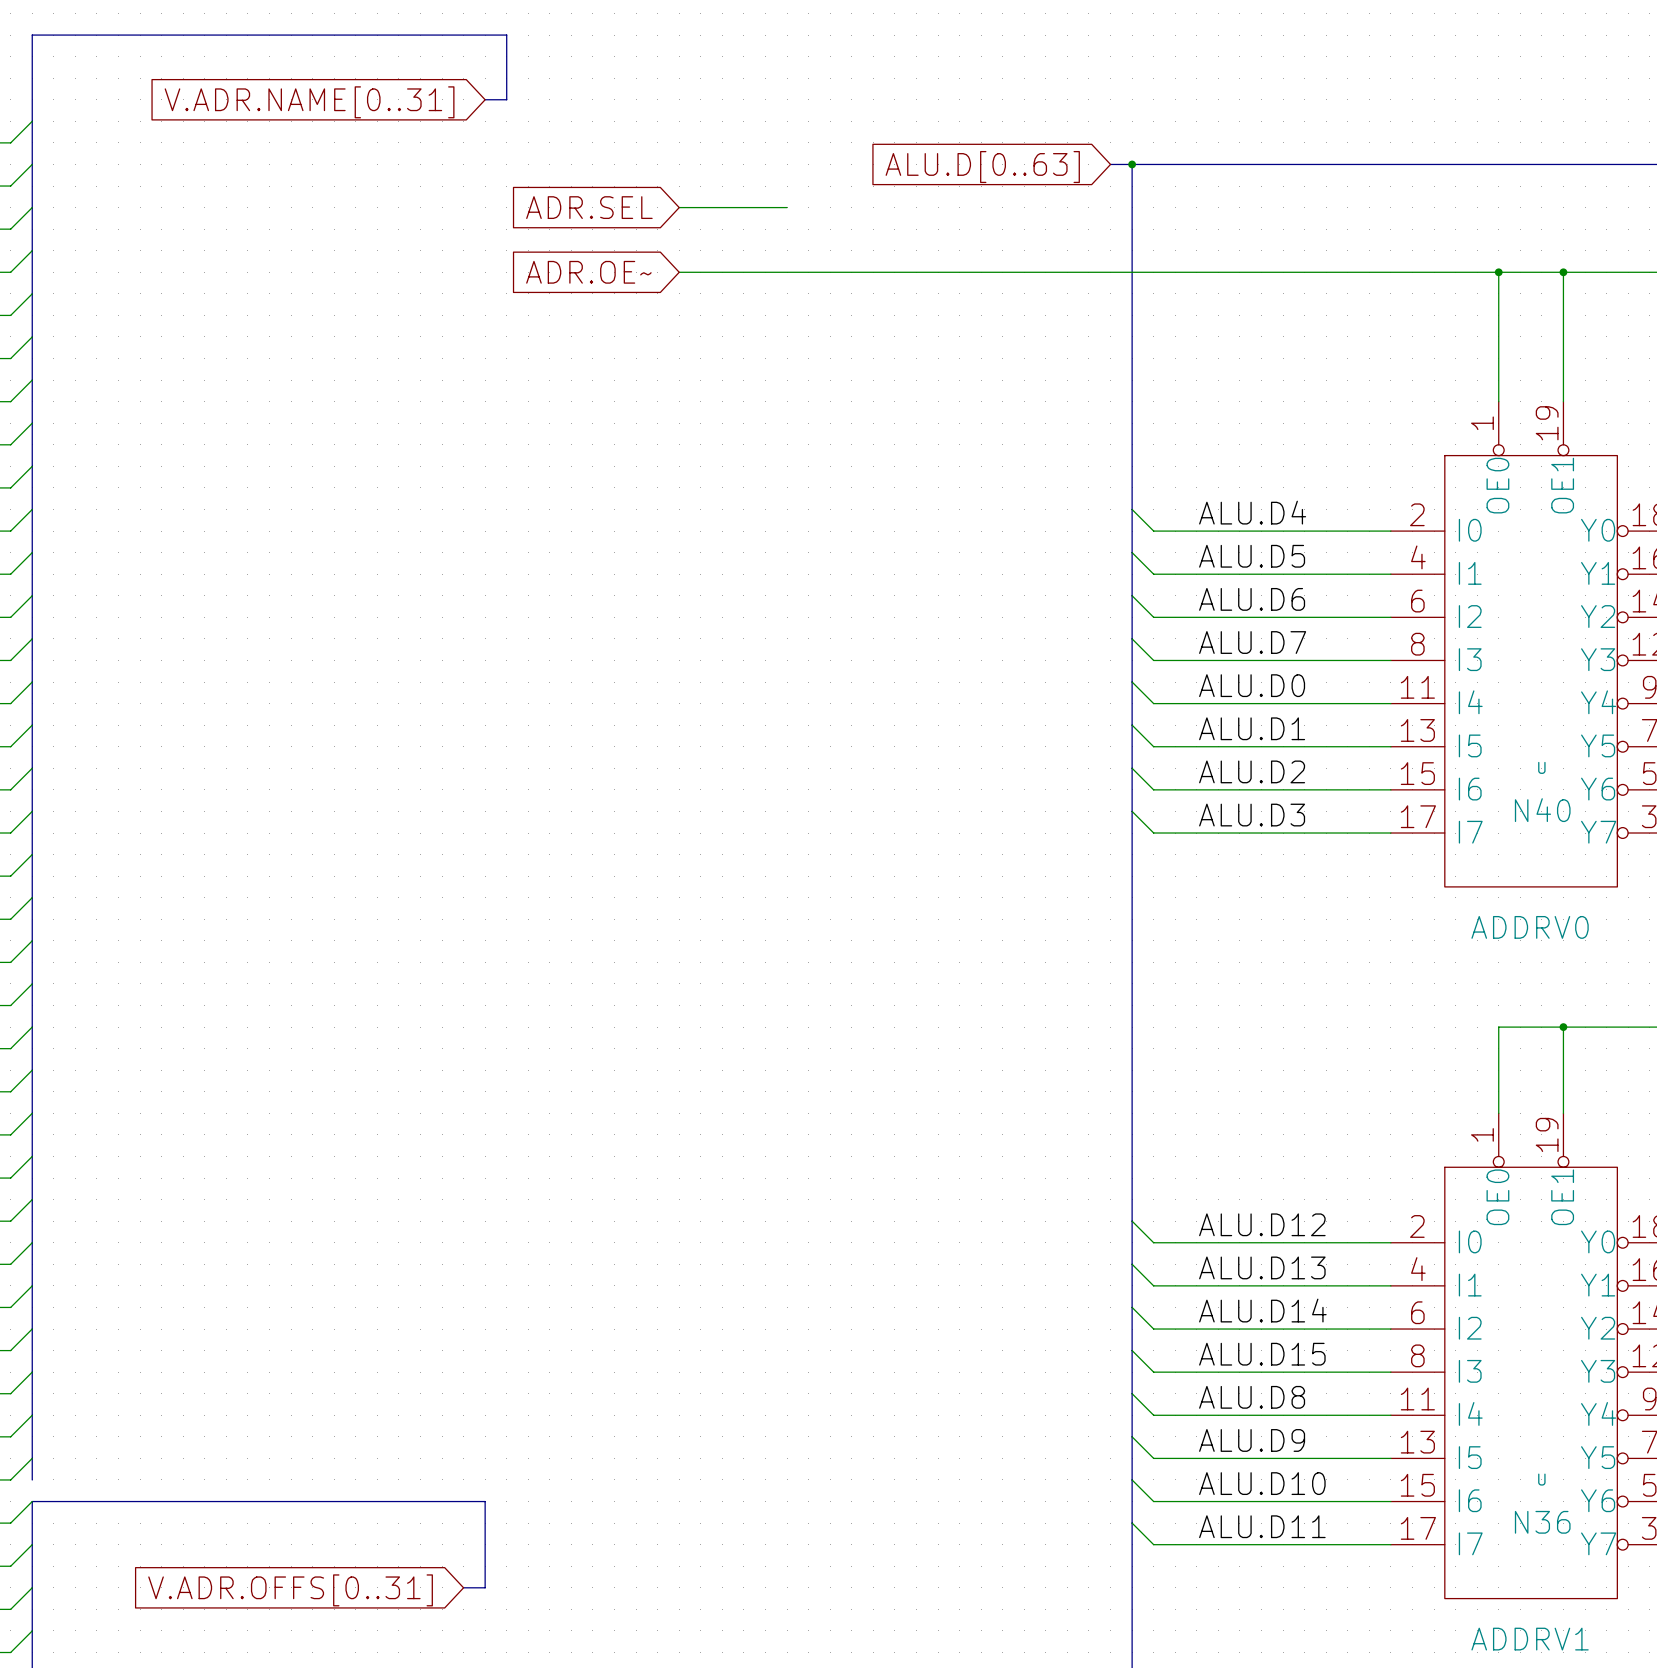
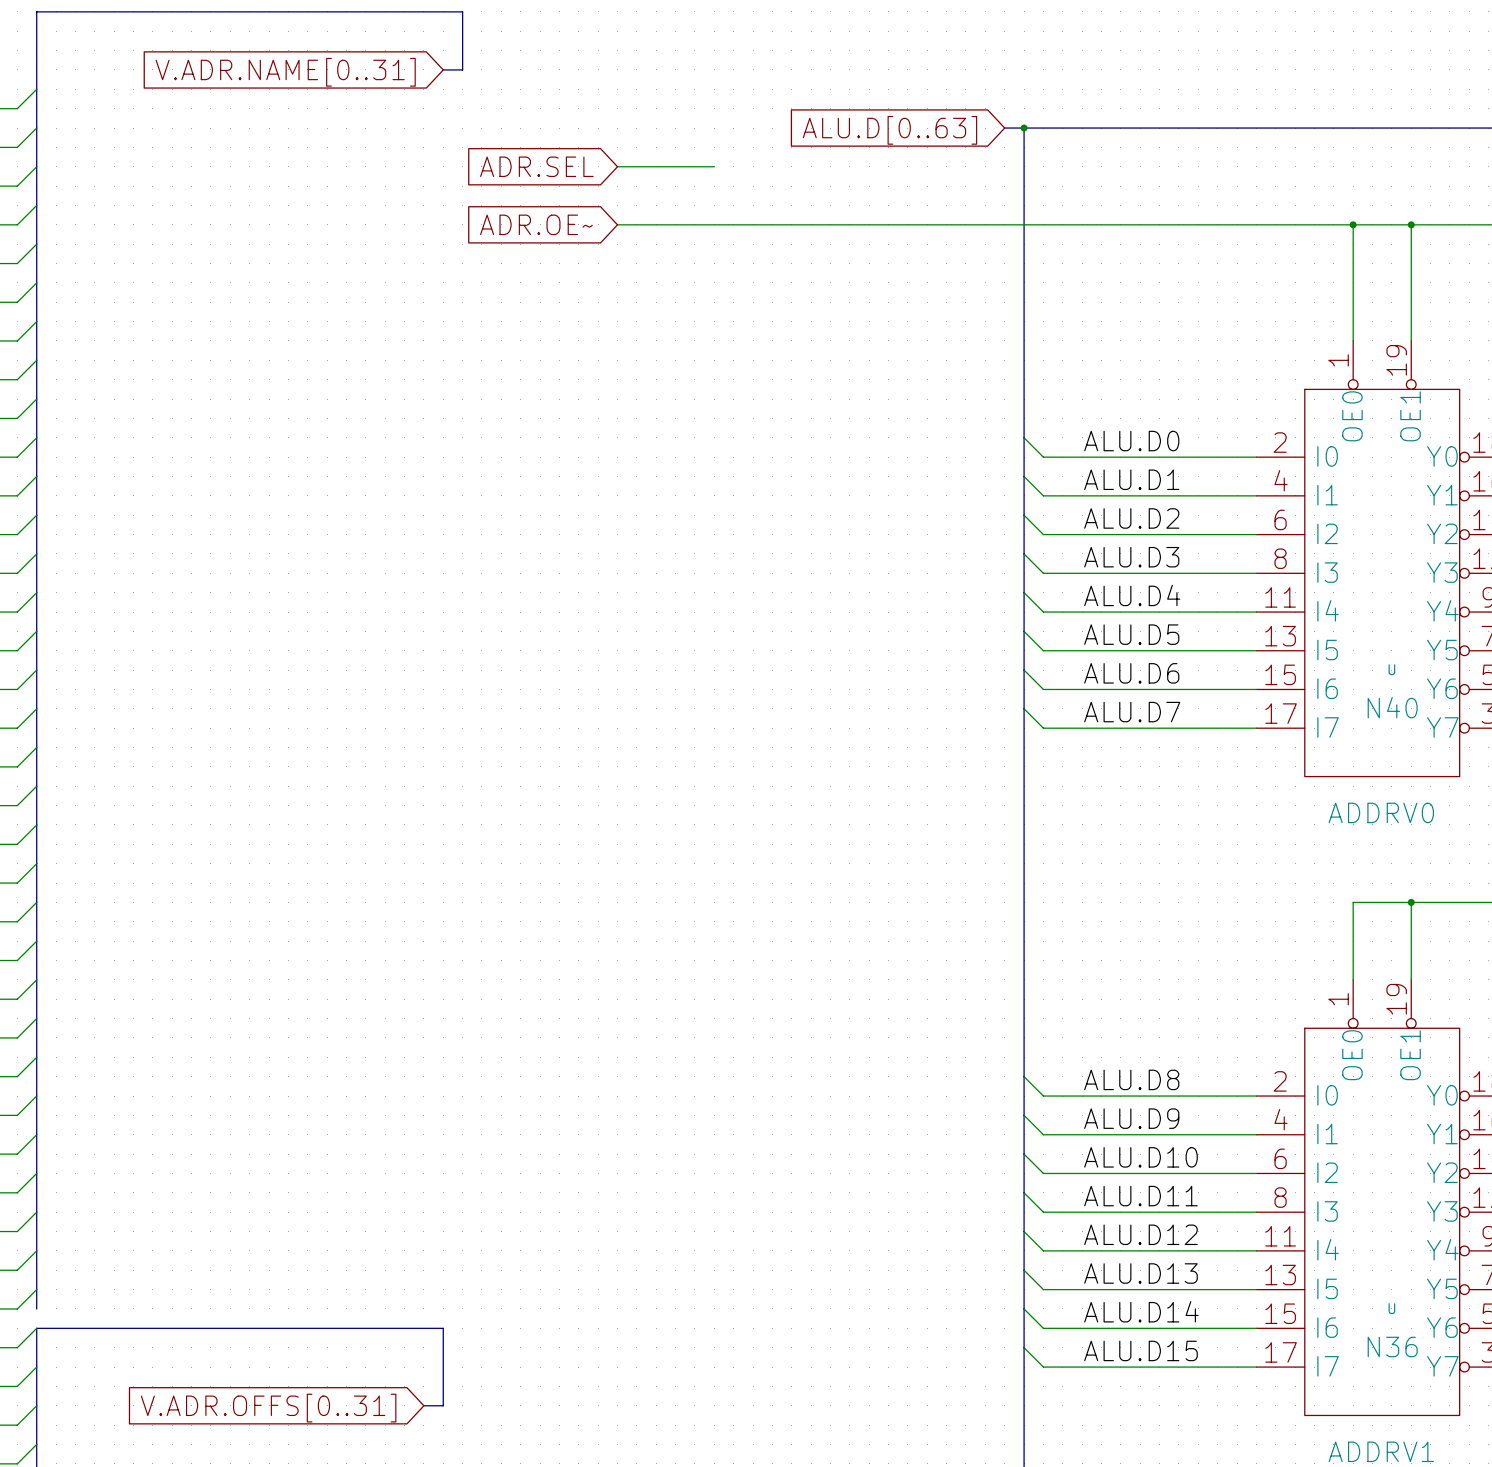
label: ALU.D4 (1252, 512) -> ALU.D0 (1131, 441)
label: ALU.D5 (1252, 556) -> ALU.D1 (1131, 479)
label: ALU.D6 (1252, 599) -> ALU.D2 (1131, 518)
label: ALU.D7 (1252, 642) -> ALU.D3 (1131, 557)
label: ALU.D0 (1252, 685) -> ALU.D4 (1132, 595)
label: ALU.D1 (1252, 728) -> ALU.D5 (1131, 634)
label: ALU.D2 (1252, 771) -> ALU.D6 (1131, 673)
label: ALU.D3 (1252, 815) -> ALU.D7 (1132, 712)
label: ALU.D12 (1262, 1224) -> ALU.D8 (1131, 1079)
label: ALU.D13 (1262, 1267) -> ALU.D9 (1131, 1118)
label: ALU.D14 (1262, 1310) -> ALU.D10 (1140, 1157)
label: ALU.D15 (1262, 1354) -> ALU.D11 (1140, 1196)
label: ALU.D8 (1252, 1397) -> ALU.D12 (1140, 1234)
label: ALU.D9 (1252, 1440) -> ALU.D13 (1140, 1273)
label: ALU.D10 (1262, 1483) -> ALU.D14 (1141, 1311)
label: ALU.D11 (1262, 1526) -> ALU.D15 (1140, 1350)

